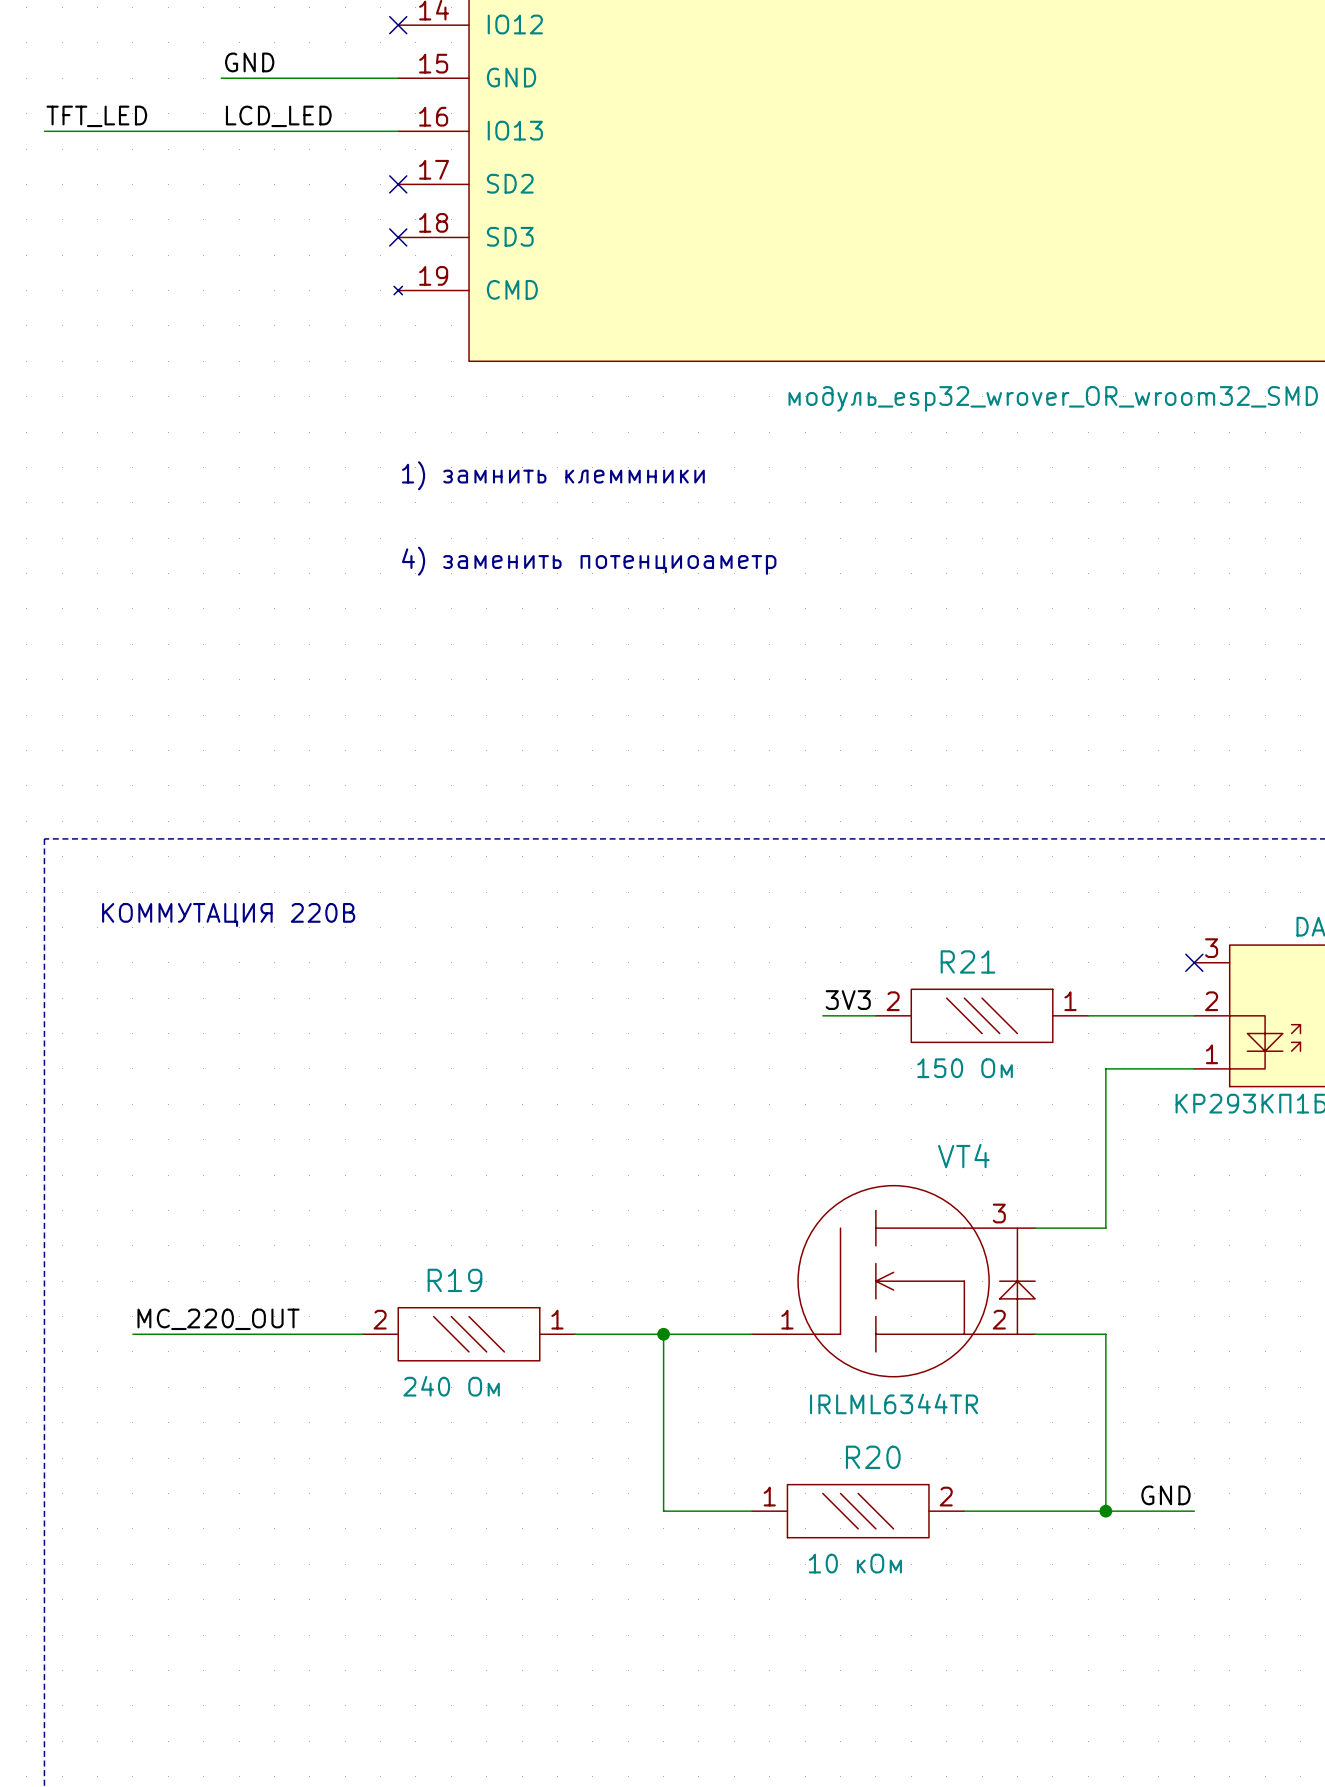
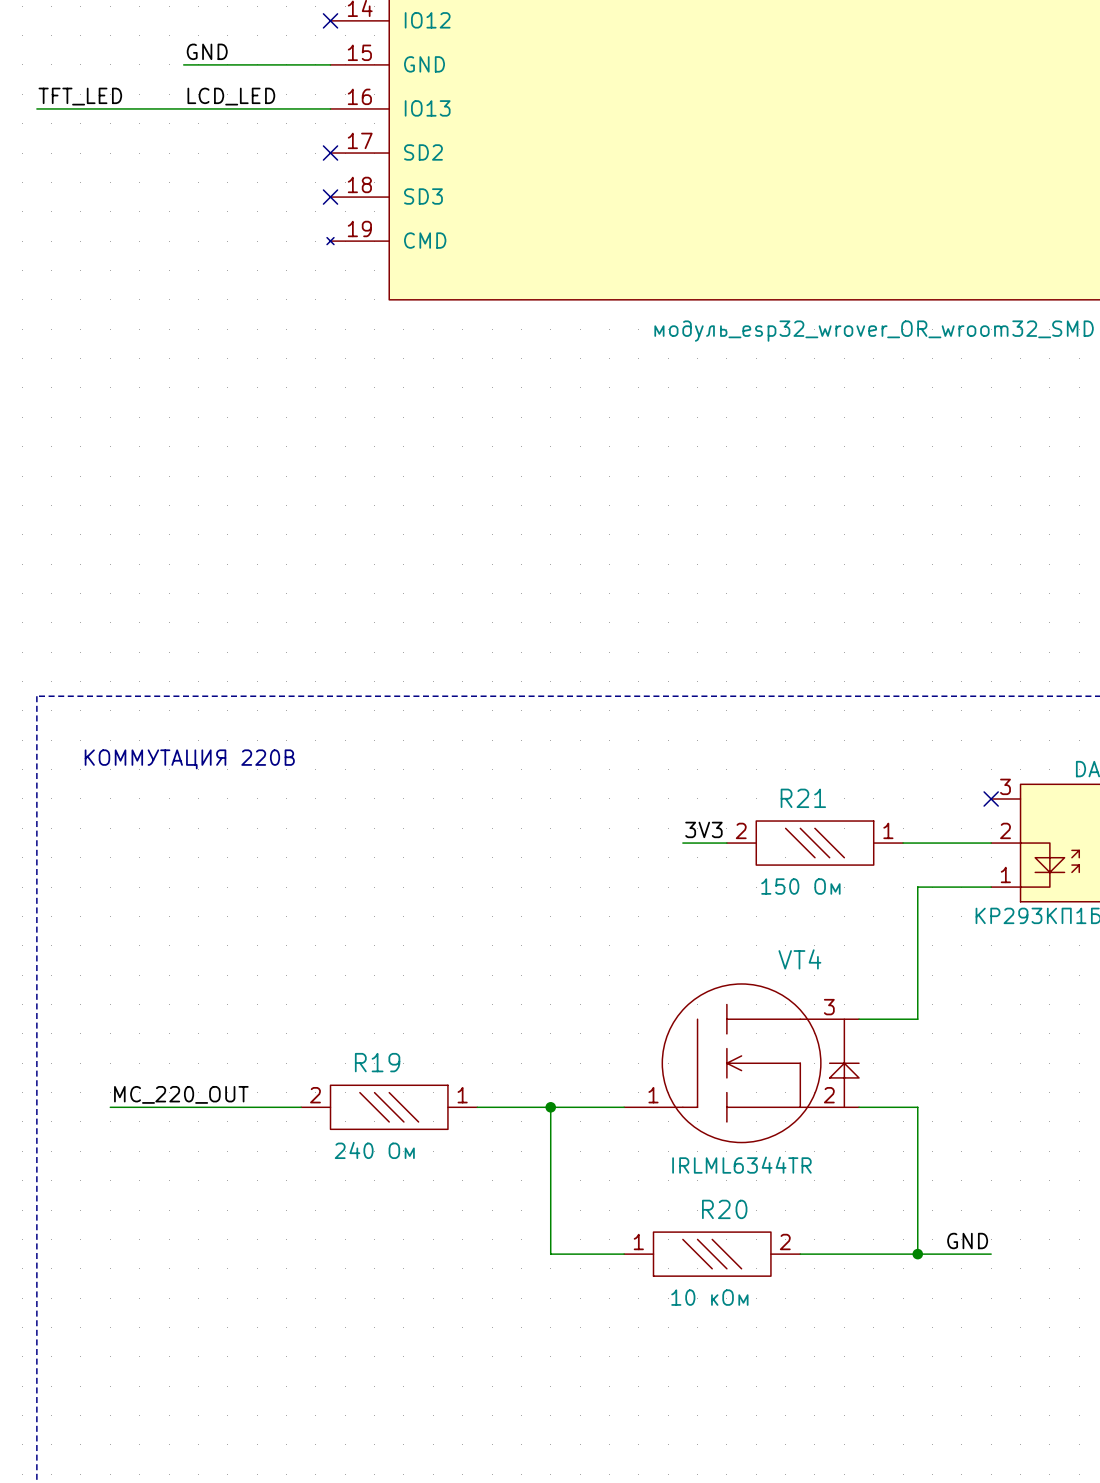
text: 1) замнить клеммники (553, 475) -> none
text: 4) заменить потенциоаметр (589, 561) -> none

